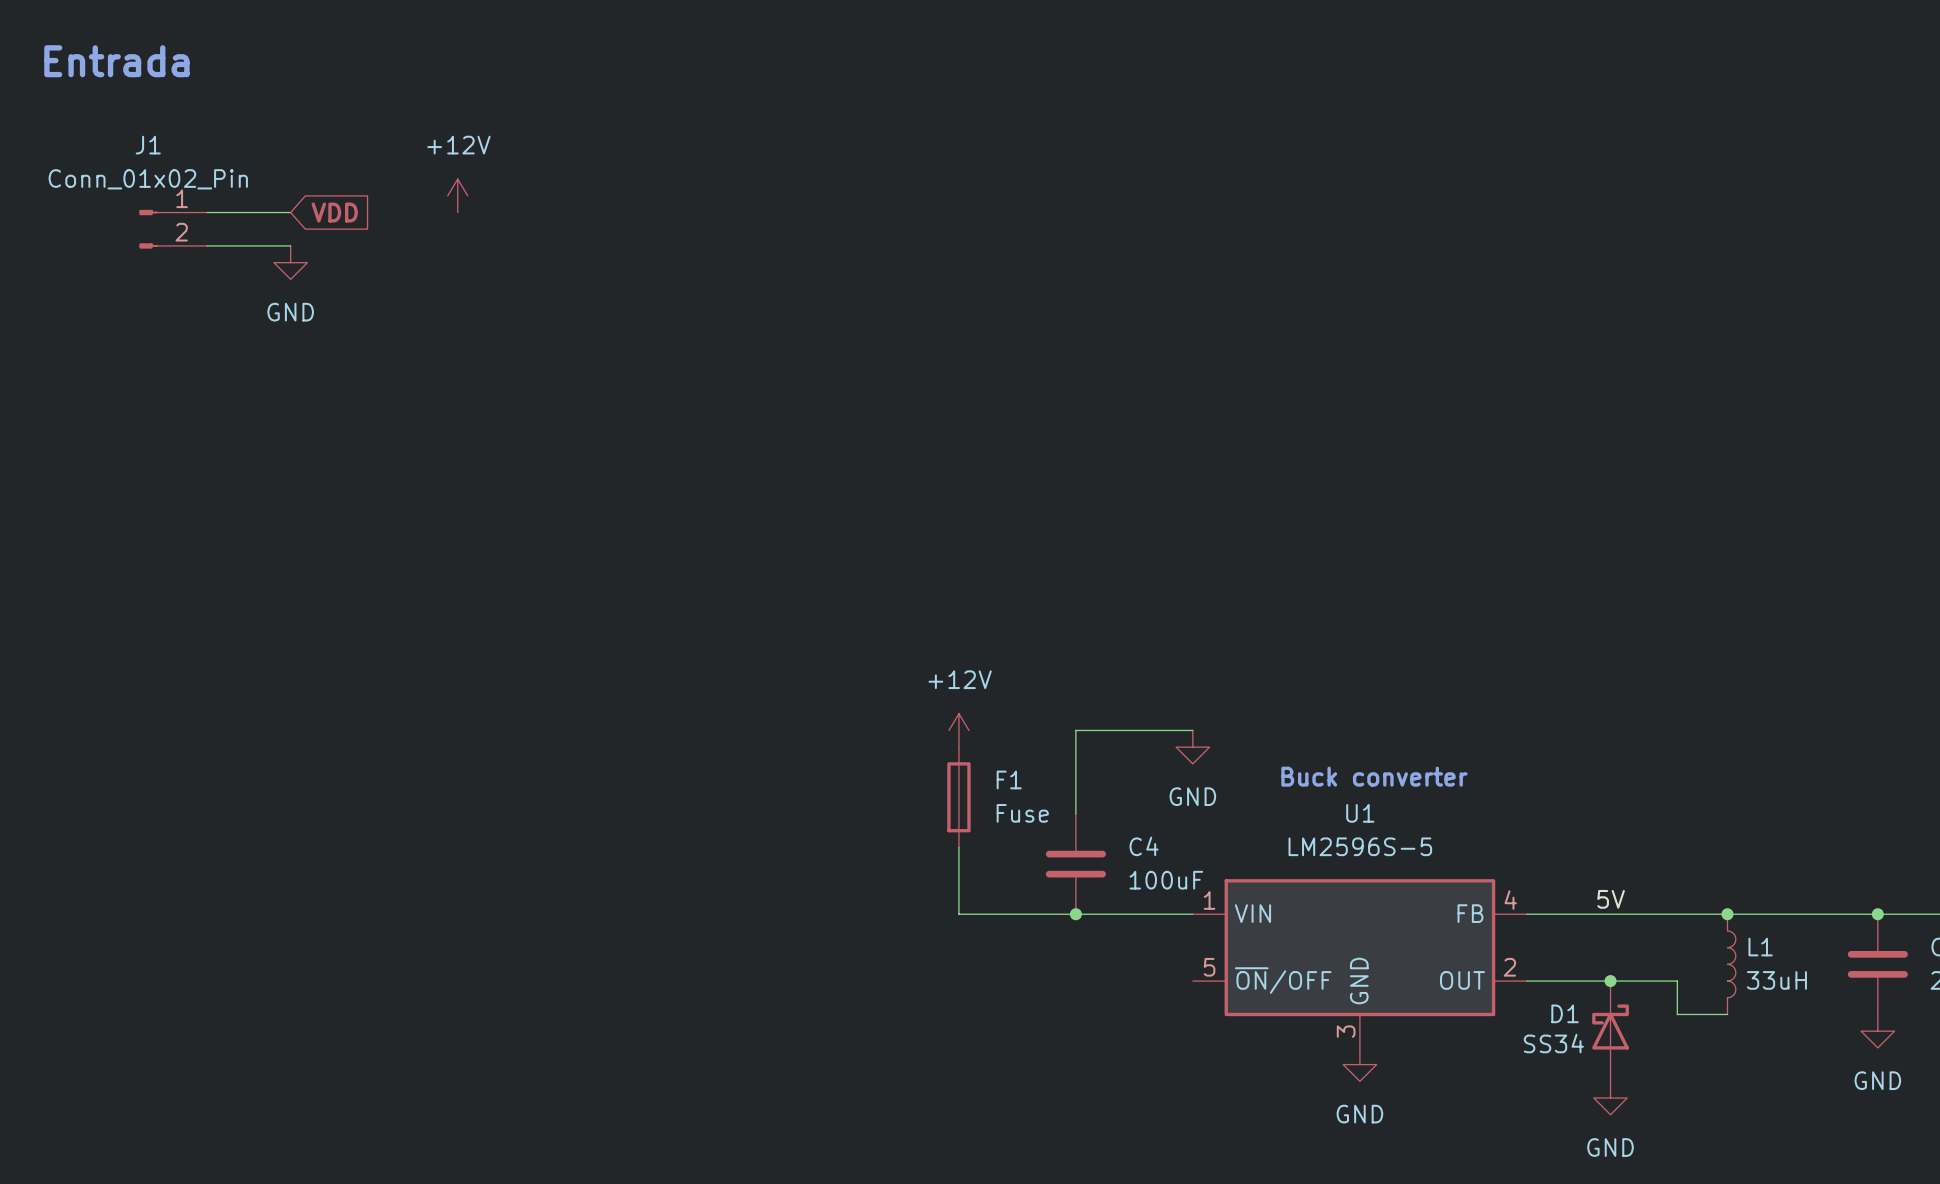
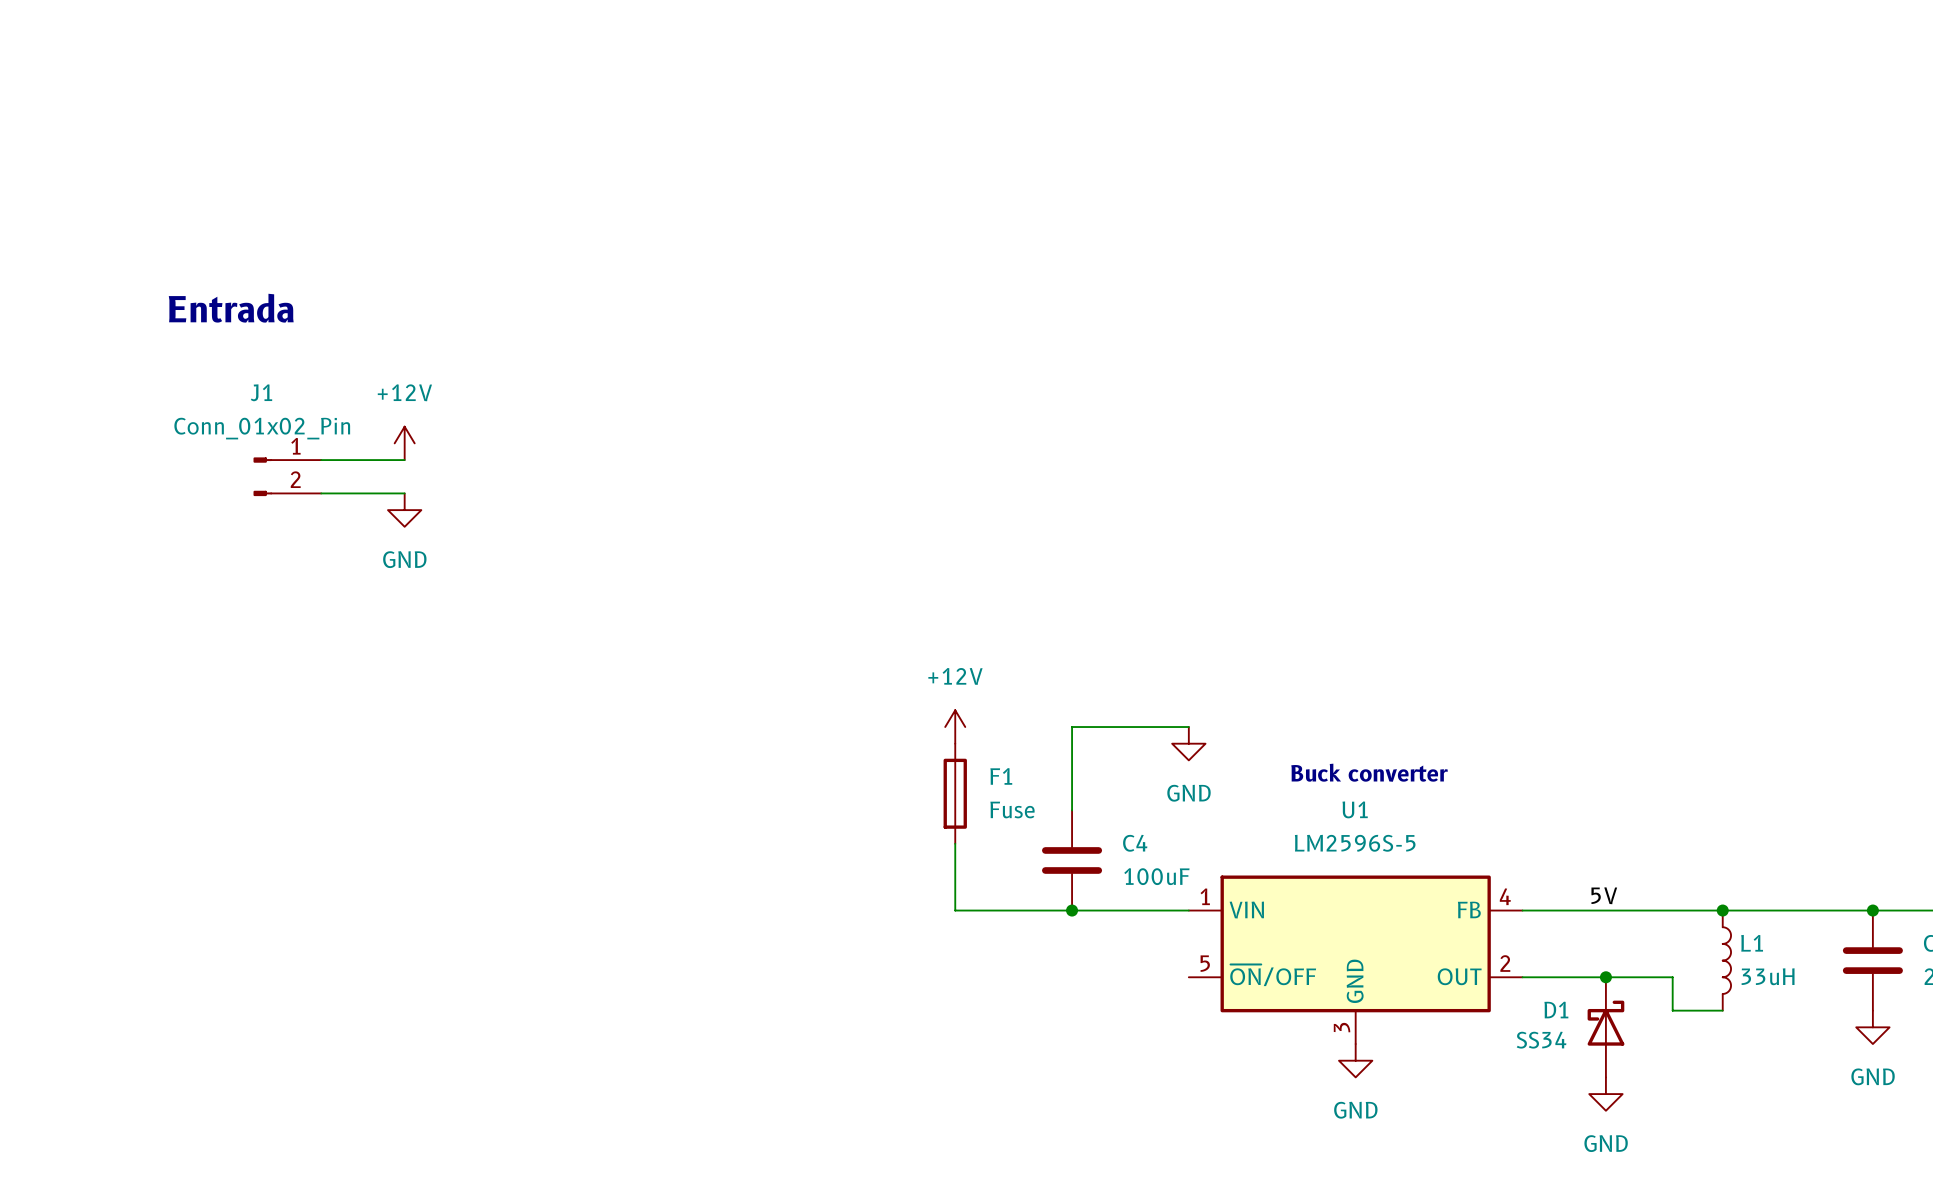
text position: Entrada (116, 61) -> Entrada (231, 308)
power symbol position: +12V (457, 195) -> +12V (404, 443)
wire: (207, 212) (290, 212) -> (321, 460) (404, 460)
global label: VDD (334, 212) -> none
J1 position: (173, 229) -> (287, 476)
wire: (207, 245) (290, 245) -> (321, 493) (404, 493)
power symbol position: GND (290, 262) -> GND (404, 510)

